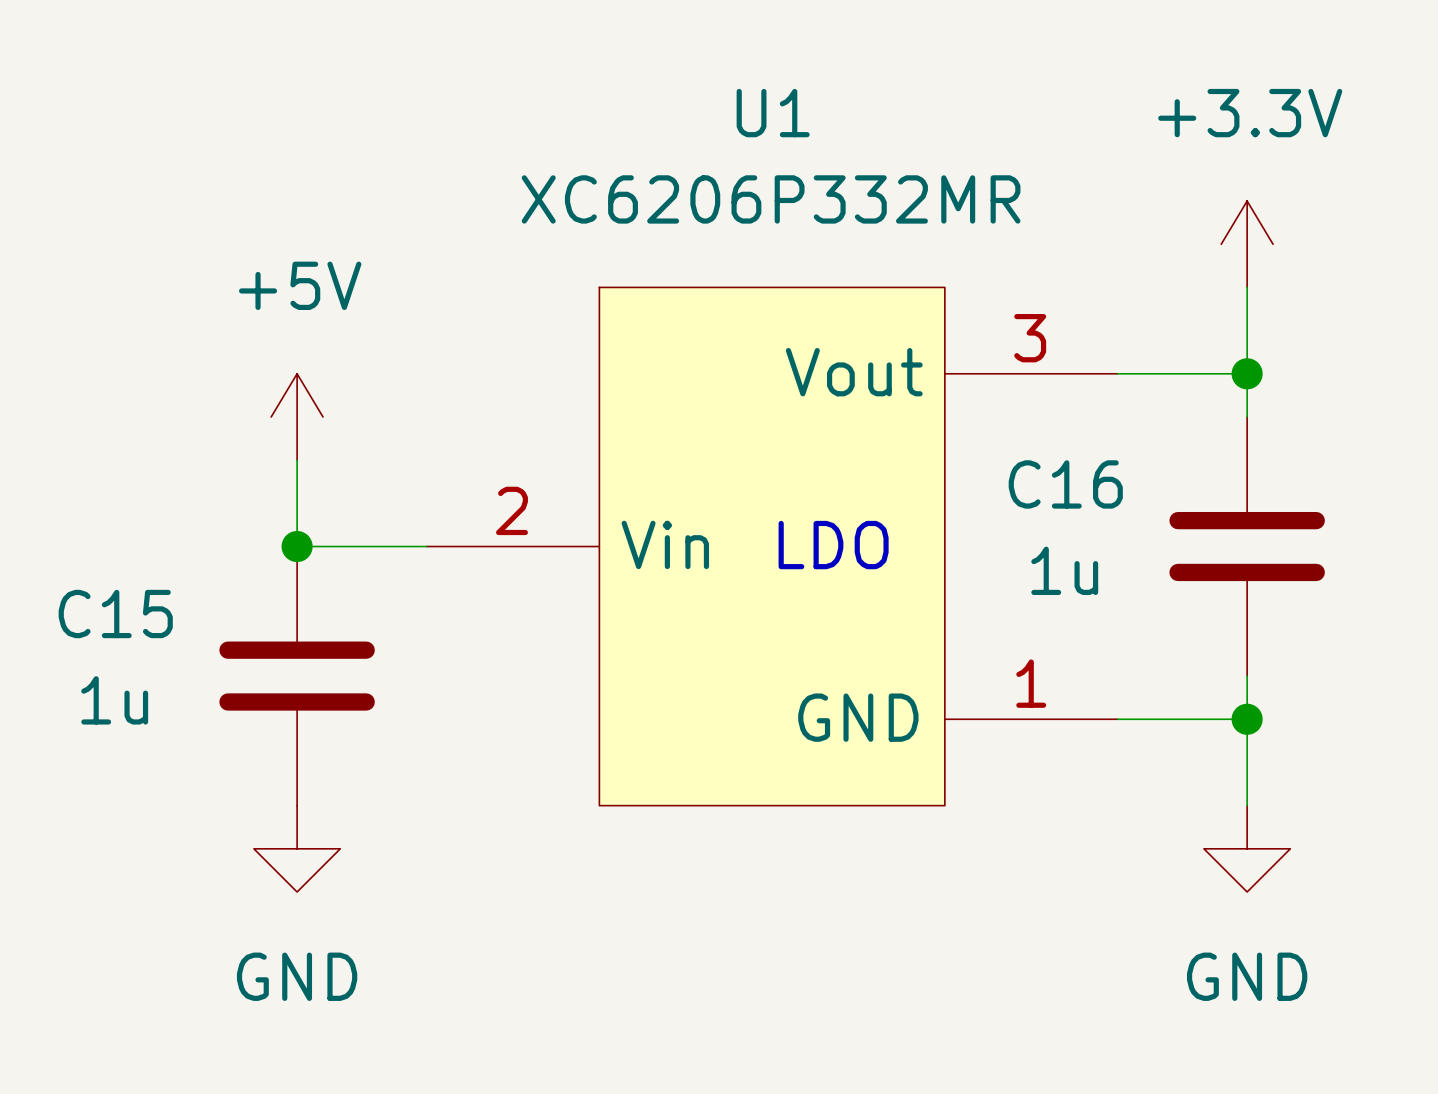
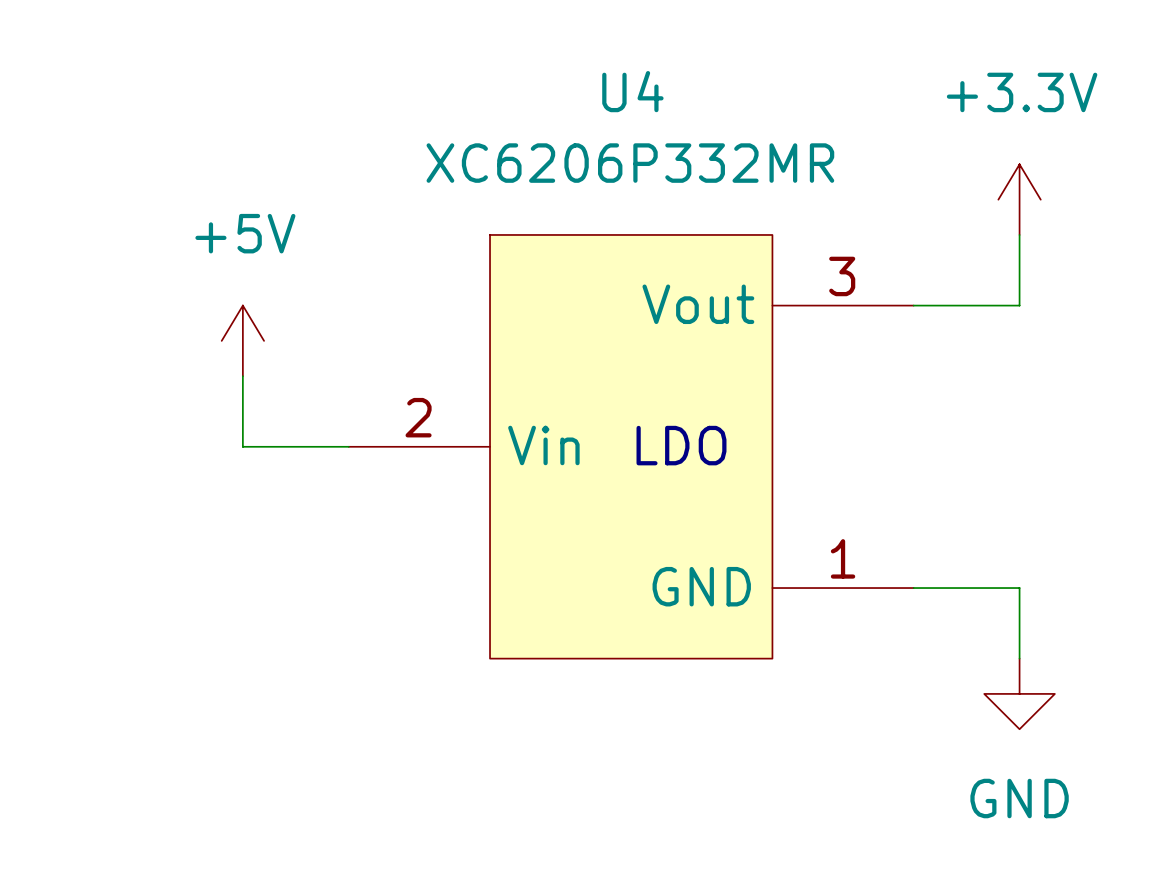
U1 name: U1 (773, 113) -> U4 (632, 91)
wire: (1247, 373) (1247, 416) -> none
junction: (1247, 373) -> none
junction: (297, 546) -> none
C16: 1u (1247, 546) -> none
C15: 1u (297, 676) -> none
wire: (1247, 676) (1247, 719) -> none
junction: (1247, 719) -> none
power symbol: GND (297, 848) -> none

